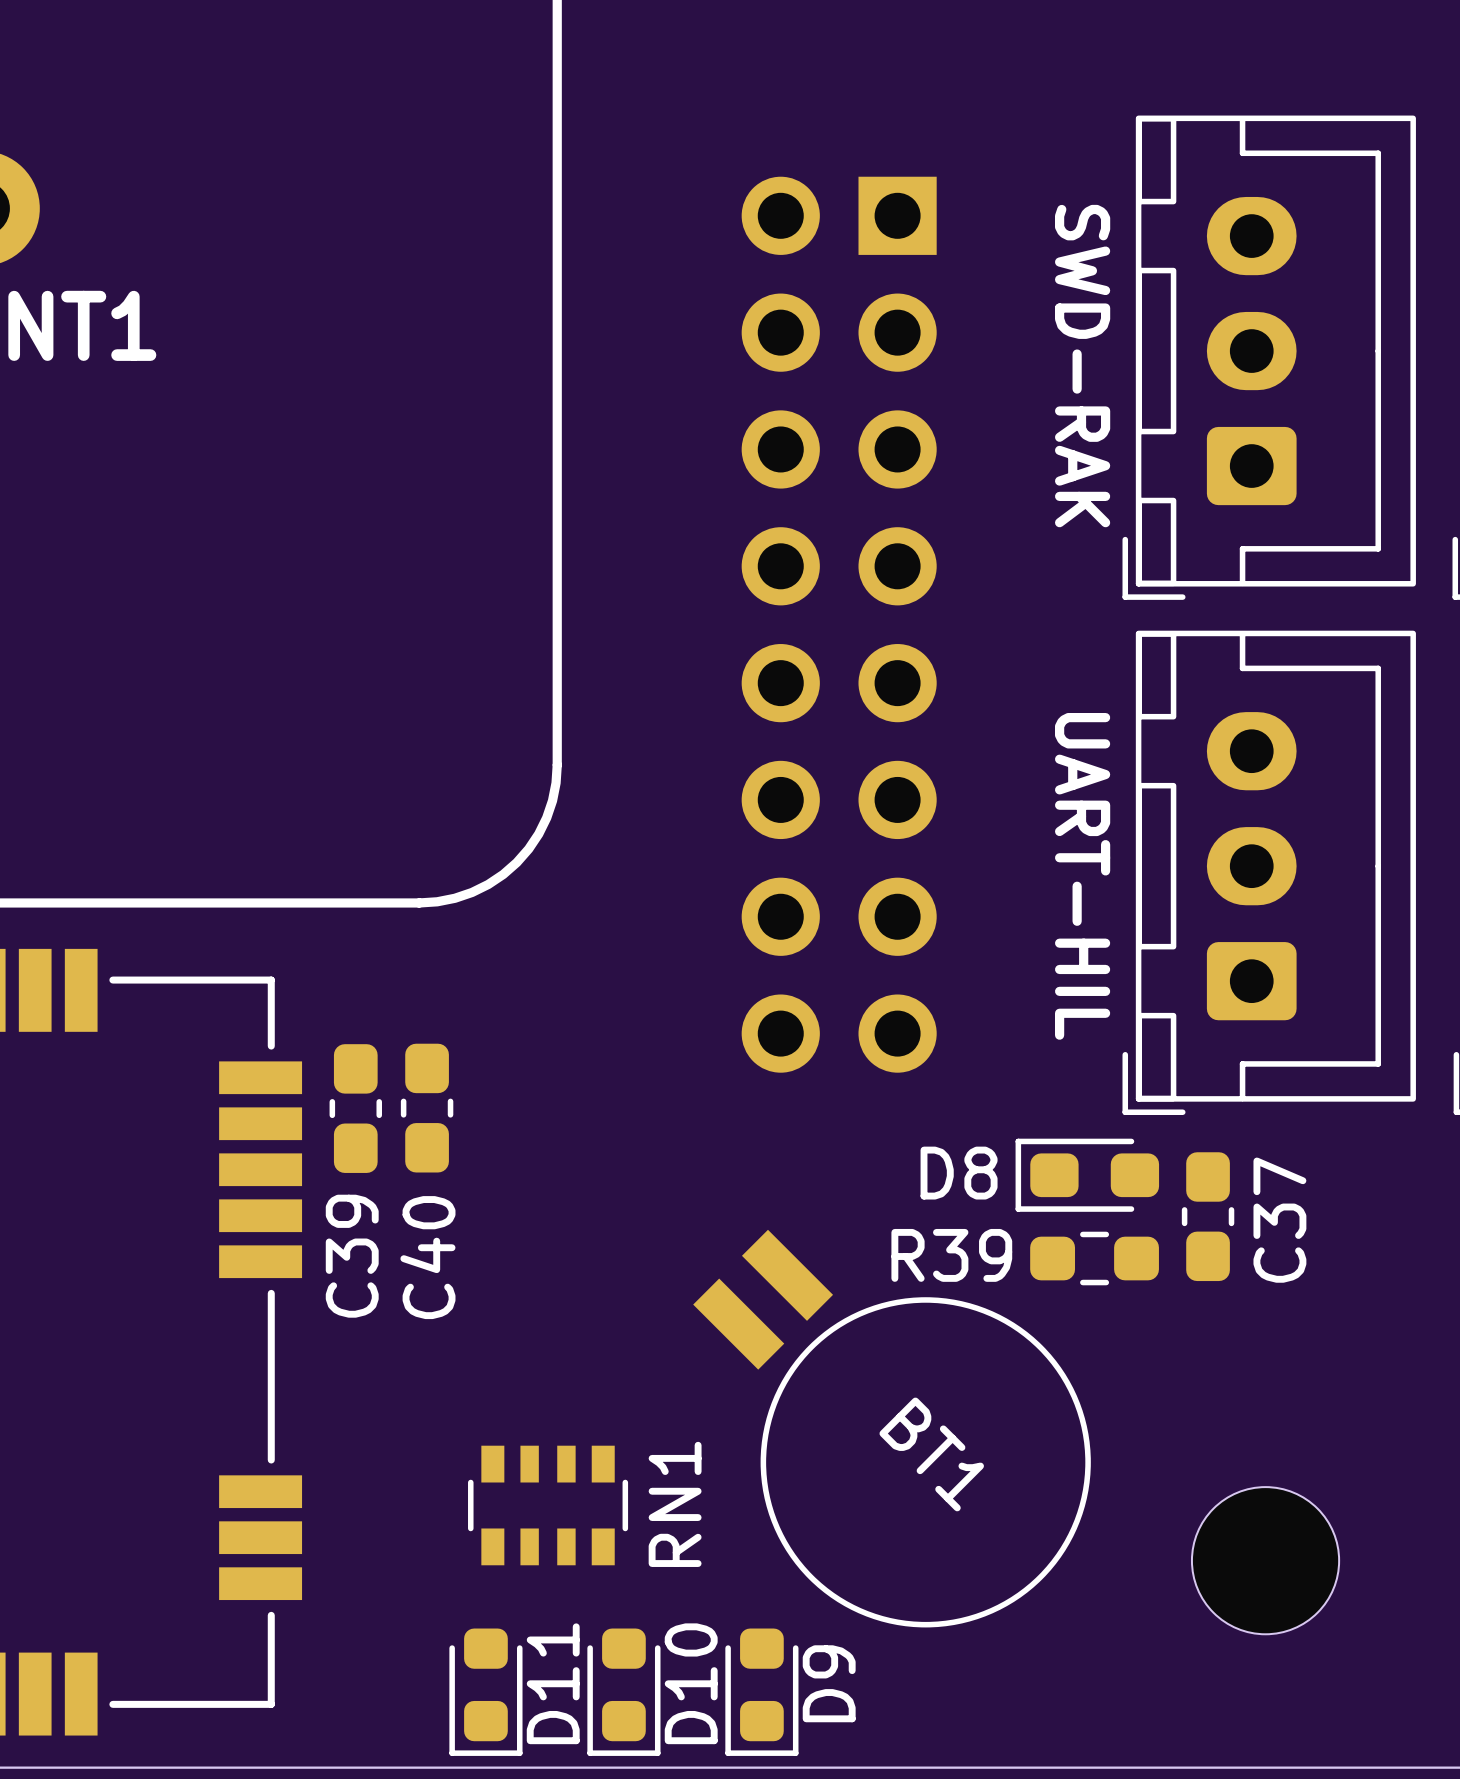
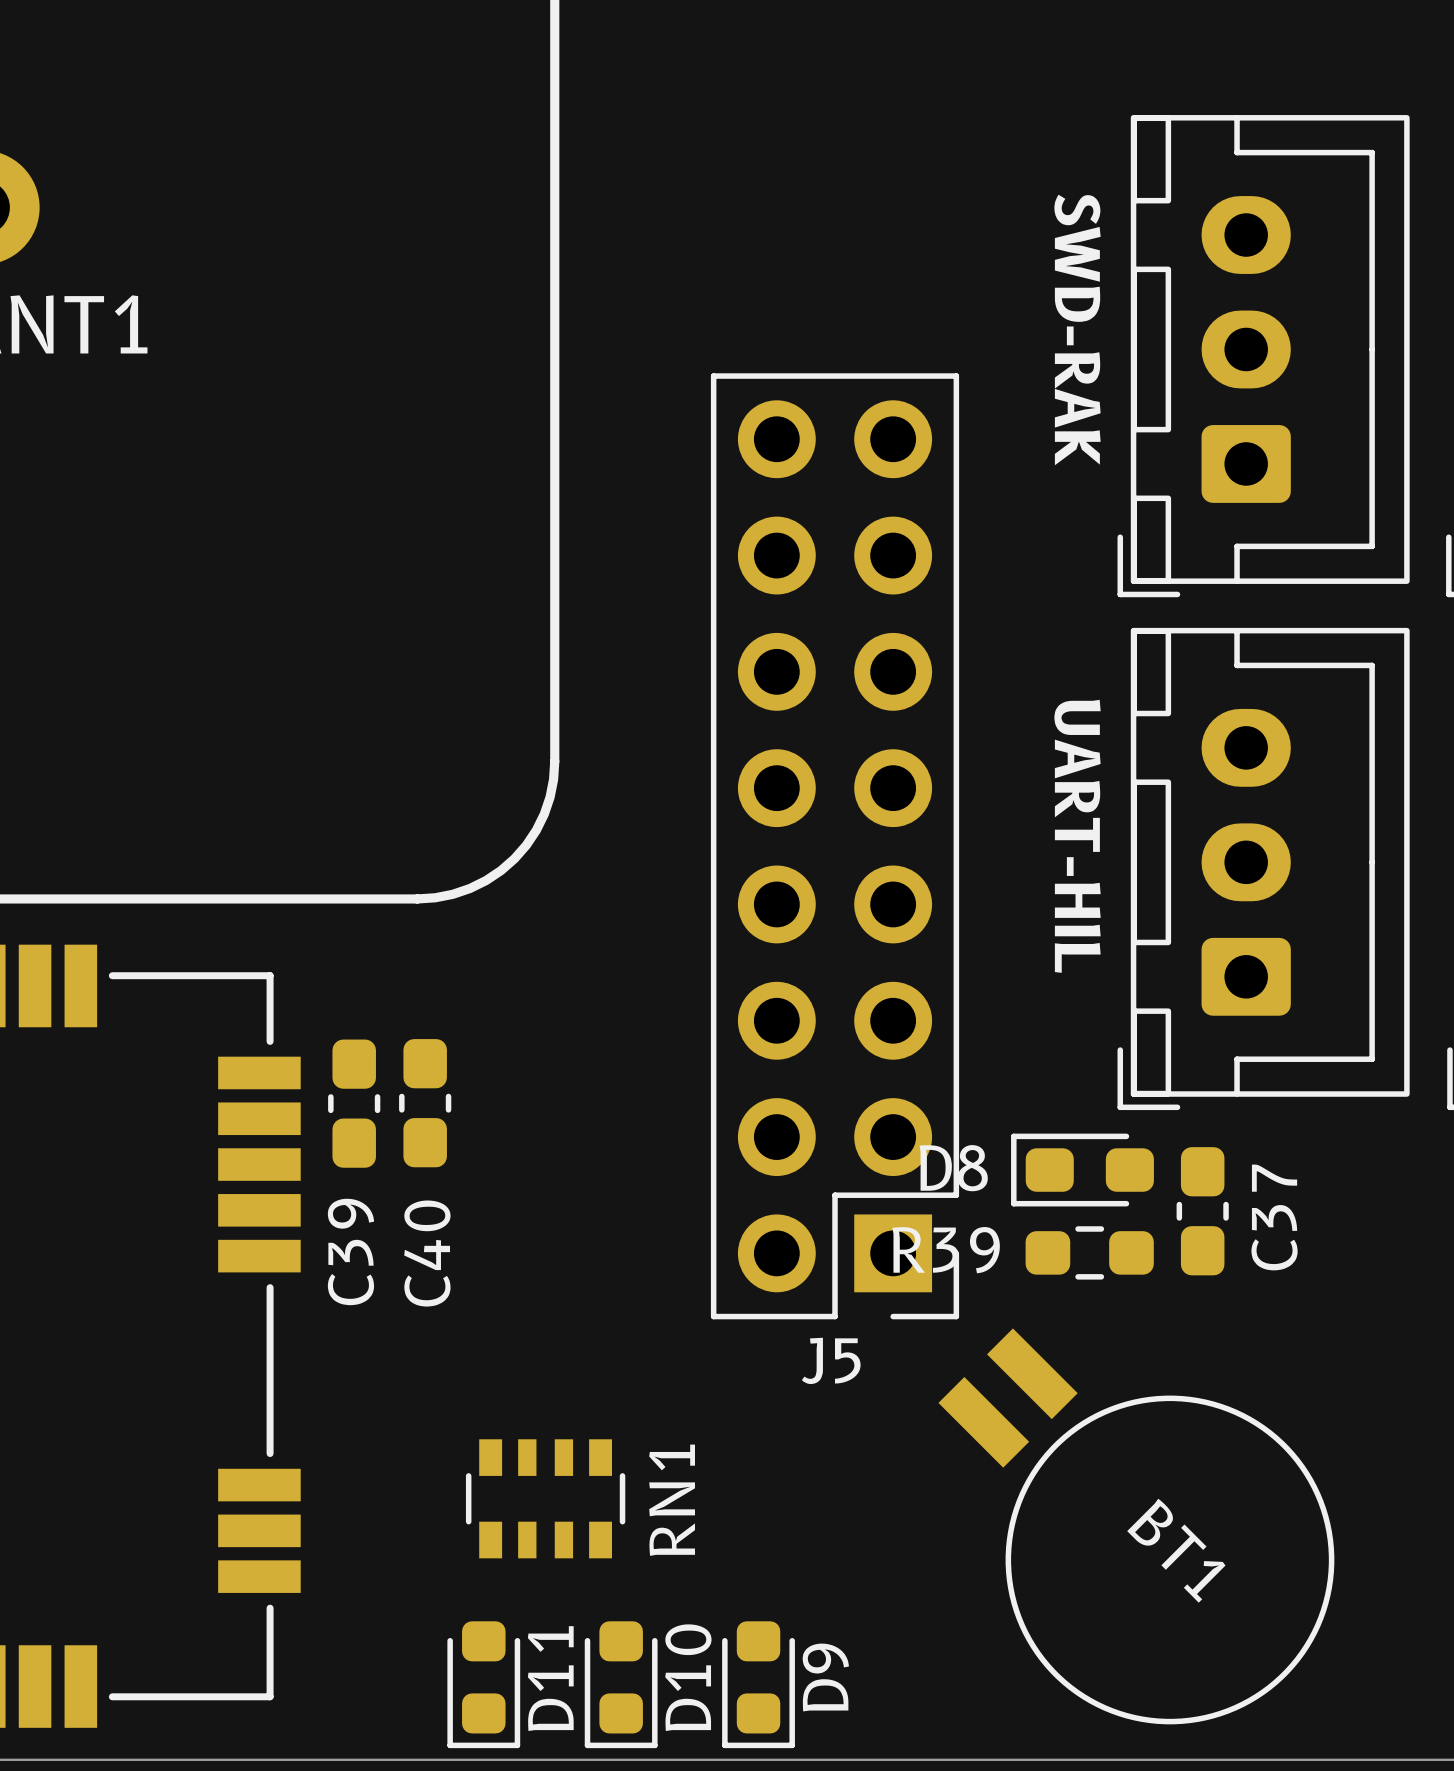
J5 side: bottom (839, 624) -> top (834, 846)
BT1 position: (892, 1428) -> (1136, 1526)
part: (1265, 1560) -> none

